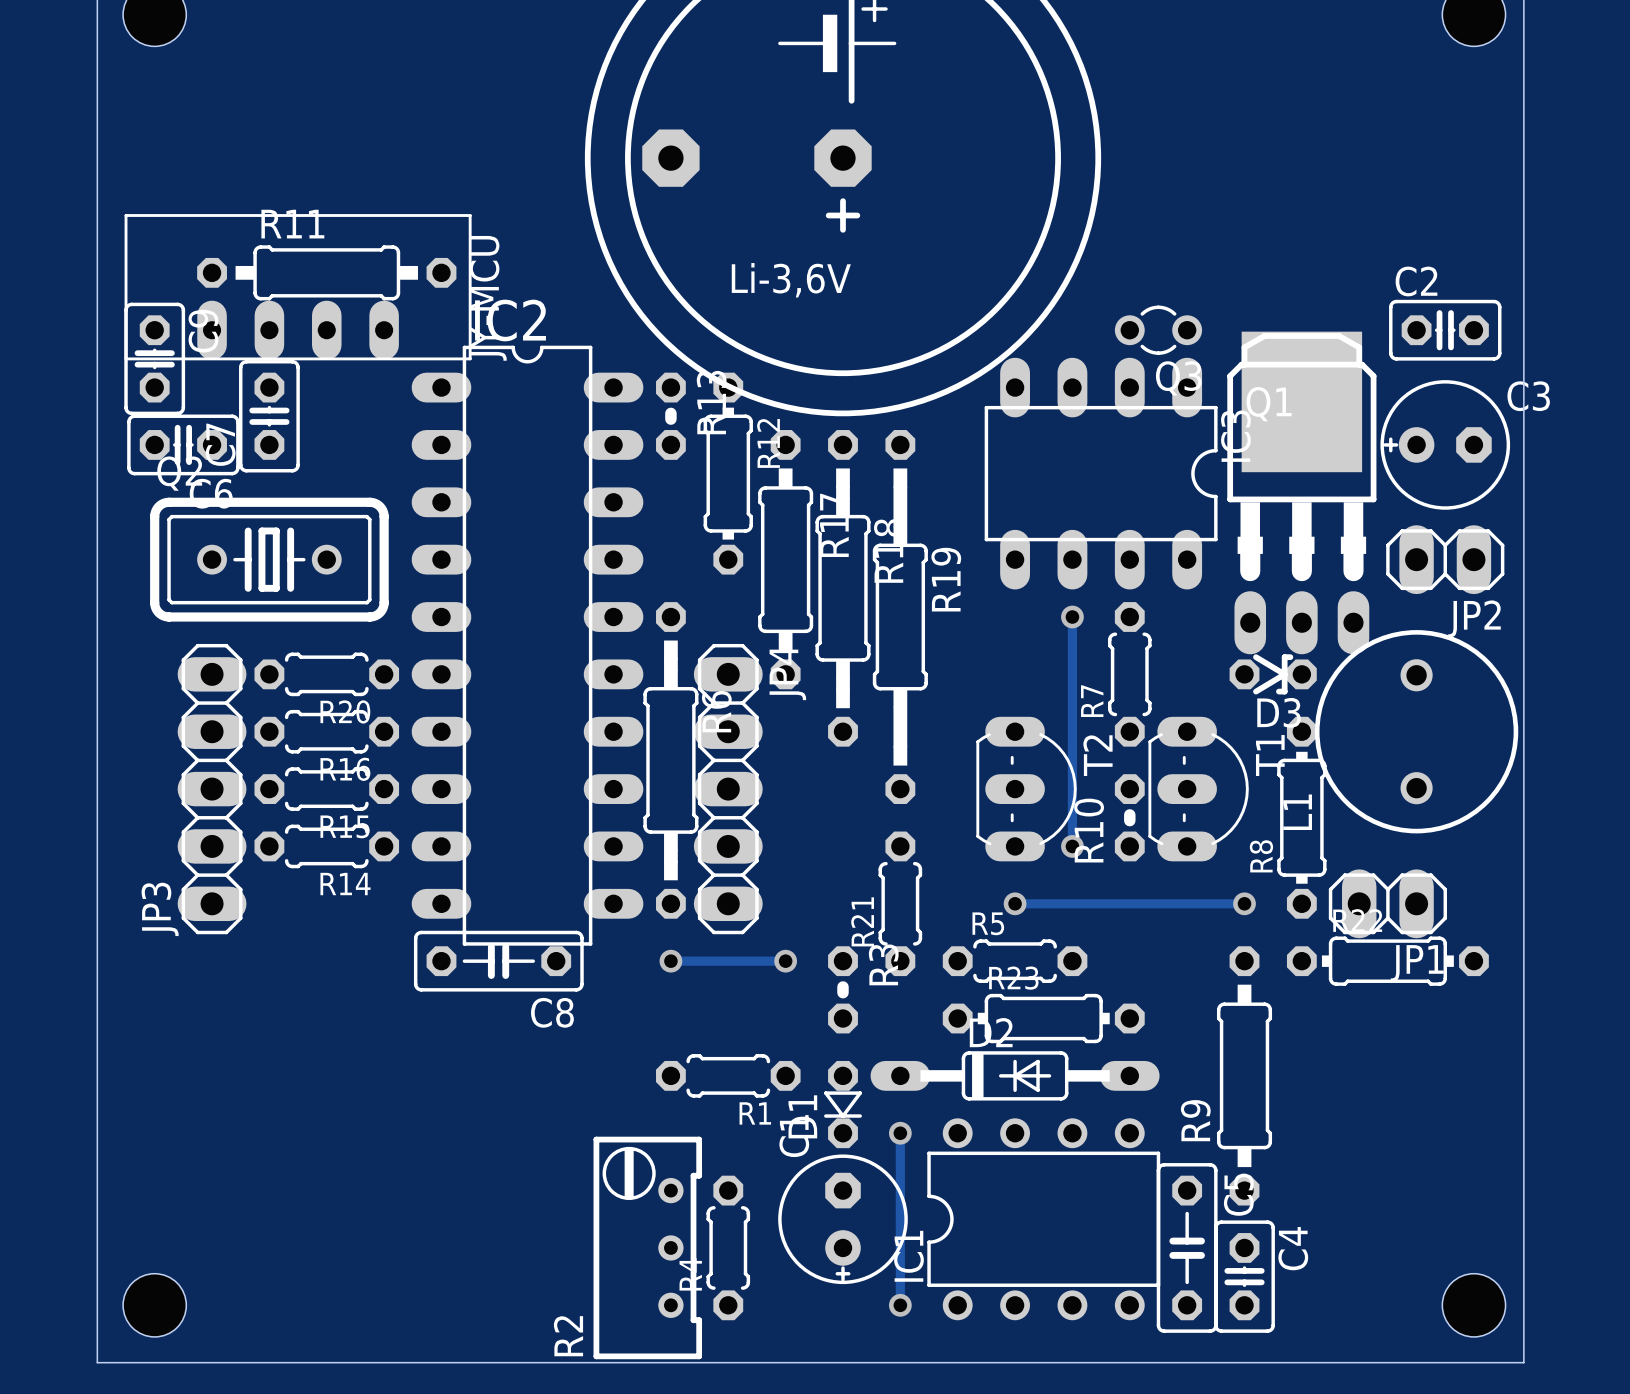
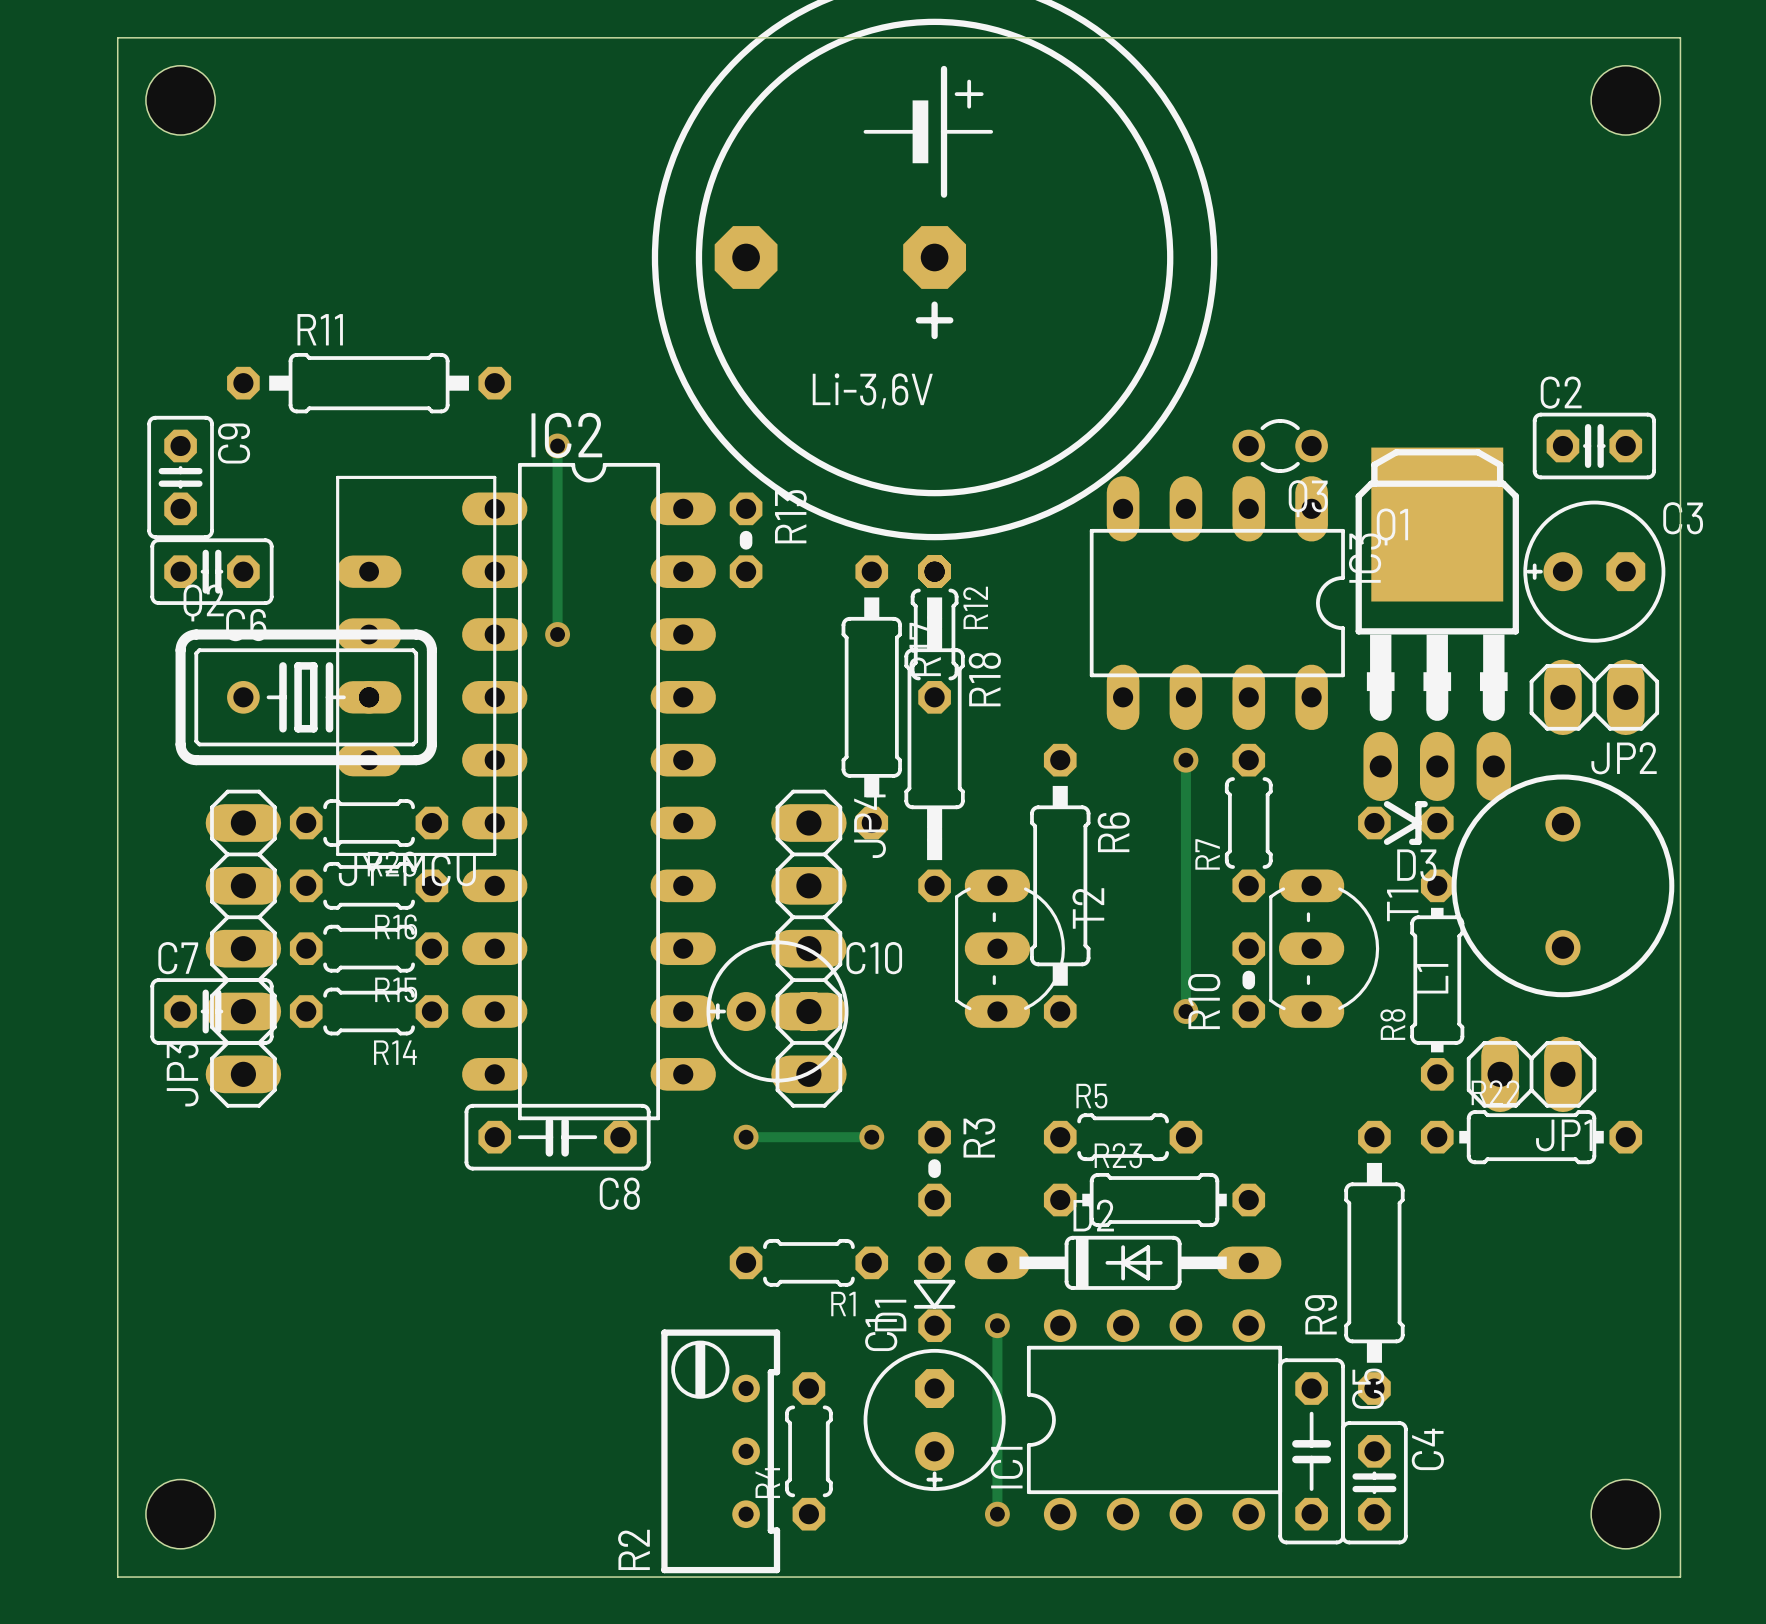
part rotation: 0° (298, 287) -> 90° clockwise (416, 665)
part position: (298, 287) -> (416, 665)
track: none -> (557, 446) (557, 634)
via: none -> (557, 446)
R12 footprint: [703, 372, 753, 575] -> [910, 555, 959, 714]
C7 rotation: 0° (269, 416) -> 90° clockwise (211, 1011)
C7 position: (269, 416) -> (211, 1011)
via: none -> (557, 634)
R6 footprint: [643, 602, 699, 919] -> [1030, 743, 1091, 1028]
R19: (900, 617) -> none
T2 position: (1026, 789) -> (1009, 948)
C10: none -> (777, 1011)
R21: (900, 903) -> none
track: (1015, 903) (1244, 903) -> none
via: (1015, 903) -> none
via: (1244, 903) -> none

